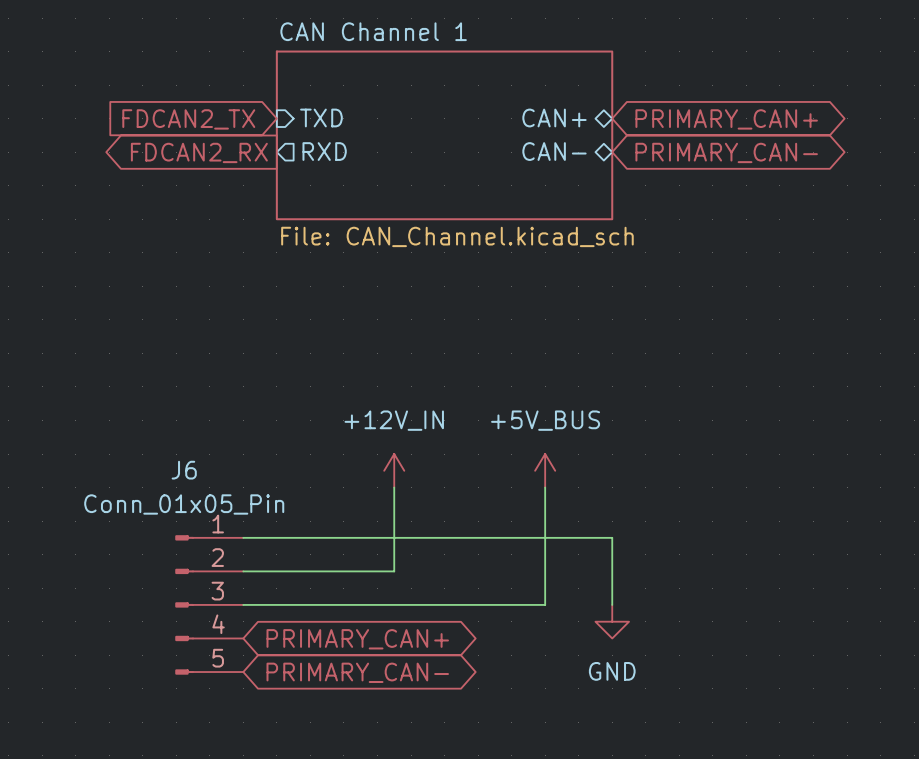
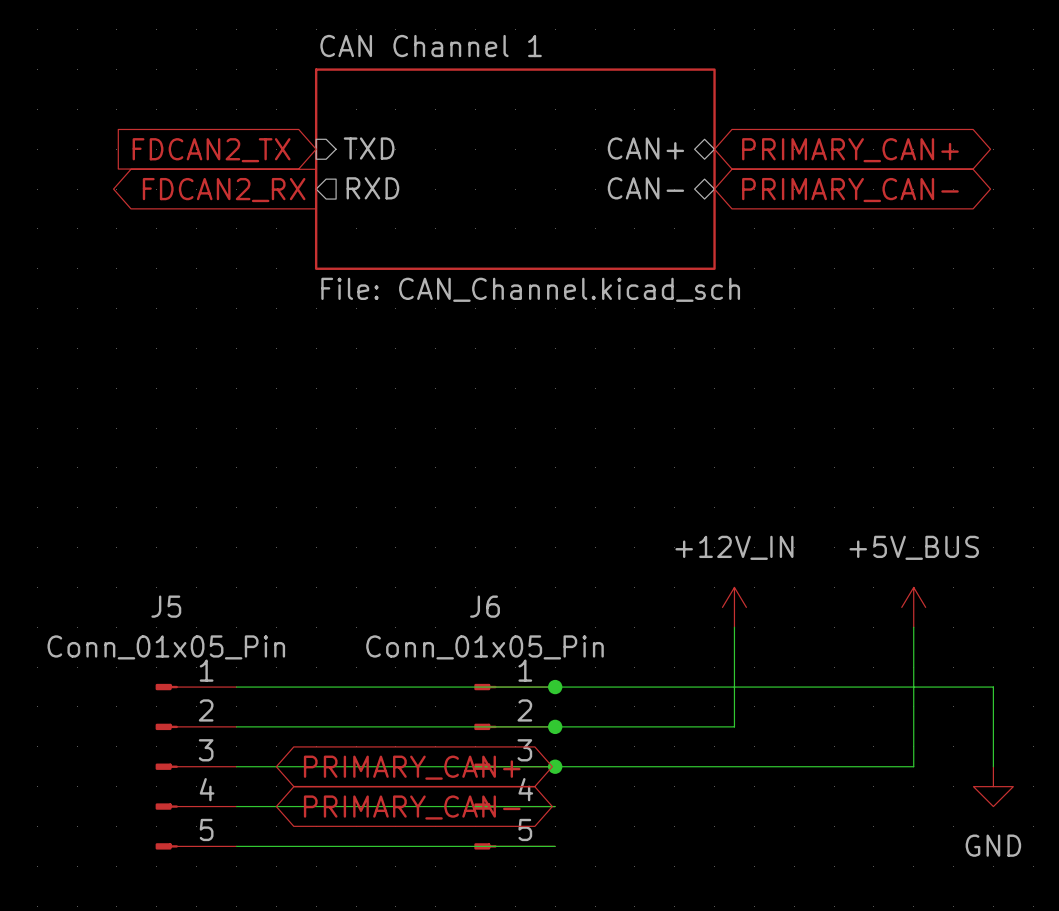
power symbol position: +12V_IN (394, 470) -> +12V_IN (734, 607)
power symbol position: +5V_BUS (545, 470) -> +5V_BUS (913, 607)
wire: (394, 487) (394, 571) -> (993, 766) (993, 687) (455, 687)
wire: (545, 487) (545, 604) -> (734, 627) (734, 726) (634, 726)
wire: none -> (913, 627) (913, 766) (236, 766)
wire: (243, 537) (612, 537) (612, 604) -> none
junction: none -> (555, 687)
J6 position: (209, 604) -> (514, 766)
junction: none -> (555, 726)
power symbol position: GND (612, 621) -> GND (993, 786)
J5: none -> Conn_01x05_Pin (196, 766)
junction: none -> (555, 766)
wire: none -> (236, 806) (555, 806)
wire: none -> (236, 846) (555, 846)

